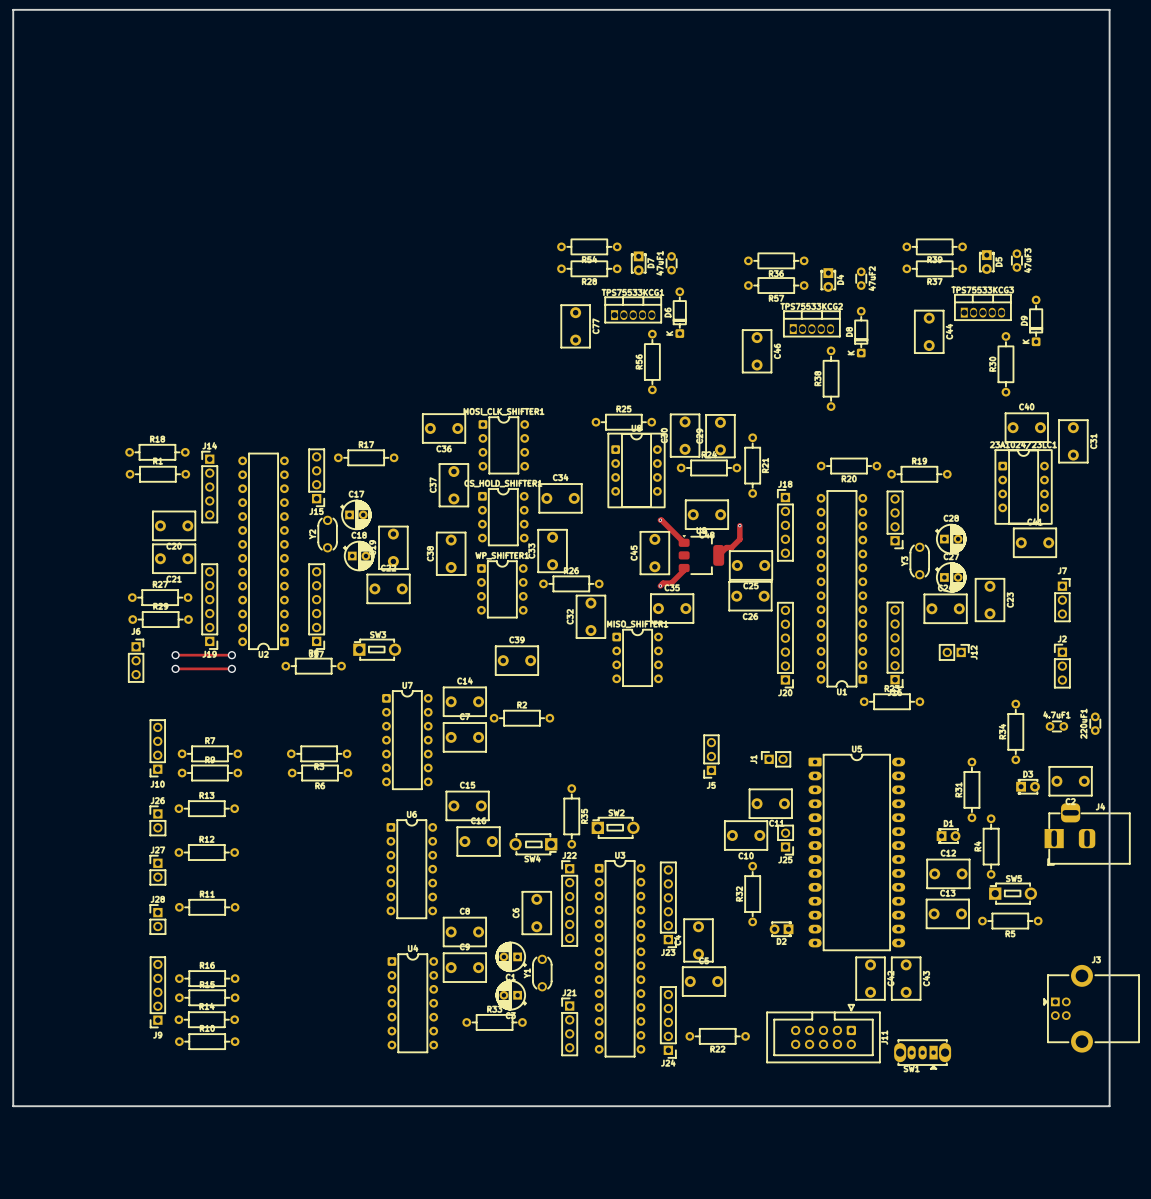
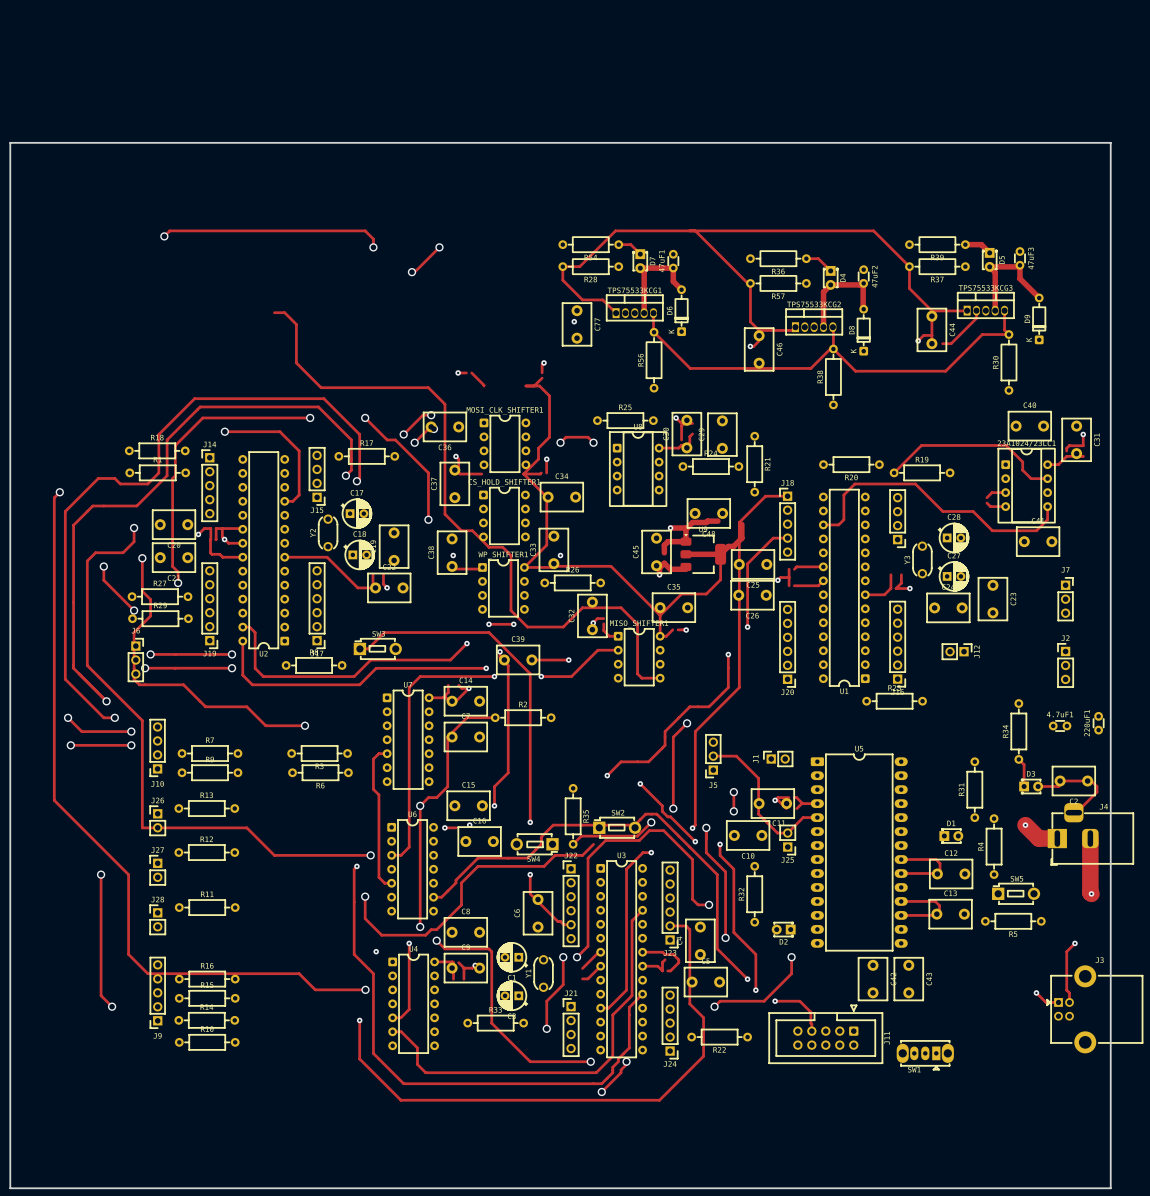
board edge: (13, 9) (1109, 9) (1109, 1106) (13, 1106) (13, 9) -> (10, 142) (10, 1188) (1110, 1188) (1110, 142) (10, 142)
track: none -> (695, 230) (747, 283) (750, 283) (750, 321) (759, 330) (792, 330) (795, 327)
track: none -> (164, 236) (169, 230) (365, 230) (373, 239) (373, 247)
via: none -> (164, 236)
track: none -> (618, 244) (630, 244) (640, 254)
track: none -> (965, 244) (981, 244) (989, 252)
via: none -> (373, 247)
track: none -> (439, 247) (414, 272) (411, 272)
via: none -> (439, 247)
track: none -> (806, 258) (818, 258) (830, 270)
via: none -> (411, 272)
track: none -> (681, 289) (673, 281) (673, 268) (640, 268) (644, 271) (644, 313)
track: none -> (1039, 297) (1019, 278) (1019, 266) (989, 266) (995, 272) (995, 310)
track: none -> (863, 309) (863, 281) (860, 284) (830, 284) (823, 292) (823, 327)
track: none -> (967, 310) (931, 310) (909, 288) (909, 266) (873, 230) (615, 230) (579, 266) (562, 266) (562, 280) (582, 299) (602, 299) (616, 313)
track: none -> (976, 310) (976, 318) (951, 343) (942, 343)
track: none -> (1004, 310) (1004, 330) (1008, 334) (982, 334) (945, 371) (855, 371) (833, 349)
track: none -> (274, 312) (284, 312) (296, 324) (296, 362) (321, 387) (428, 387) (444, 404) (444, 514) (461, 530) (472, 530) (488, 547) (502, 547) (510, 555) (510, 610) (527, 627) (563, 627) (582, 607) (621, 607) (637, 624) (637, 673) (641, 678) (660, 678)
track: none -> (653, 313) (653, 331) (690, 368) (810, 368) (830, 349) (833, 349)
via: none -> (574, 321)
track: none -> (931, 321) (932, 343)
track: none -> (832, 327) (833, 349)
track: none -> (931, 335) (923, 335) (918, 340)
track: none -> (759, 340) (753, 346) (750, 346)
via: none -> (918, 340)
via: none -> (750, 346)
track: none -> (544, 362) (542, 372)
via: none -> (544, 362)
track: none -> (458, 372) (466, 372)
via: none -> (458, 372)
track: none -> (471, 372) (483, 385)
track: none -> (542, 378) (534, 385)
track: none -> (525, 385) (539, 385) (549, 395) (549, 437) (538, 448) (538, 459) (523, 474)
track: none -> (431, 415) (422, 415) (403, 434)
via: none -> (431, 415)
track: none -> (310, 417) (202, 417) (175, 445) (175, 475) (172, 478) (172, 566) (178, 572) (178, 583)
via: none -> (310, 417)
track: none -> (365, 417) (387, 439) (395, 439) (428, 472) (428, 519)
via: none -> (365, 417)
track: none -> (676, 417) (681, 423) (692, 423)
via: none -> (676, 417)
track: none -> (684, 423) (681, 426) (681, 439)
track: none -> (433, 428) (428, 428) (414, 442)
via: none -> (433, 428)
track: none -> (224, 431) (279, 431) (299, 450) (299, 494) (292, 501) (284, 501)
via: none -> (224, 431)
track: none -> (692, 433) (687, 445) (681, 445) (678, 448) (659, 448)
via: none -> (403, 434)
track: none -> (1083, 434) (1083, 445) (1069, 445) (1066, 451)
via: none -> (1083, 434)
via: none -> (414, 442)
track: none -> (560, 442) (566, 437) (588, 437) (593, 442)
via: none -> (560, 442)
via: none -> (593, 442)
track: none -> (455, 456) (458, 459) (458, 467)
via: none -> (455, 456)
track: none -> (1083, 456) (1066, 456) (1058, 464) (1047, 464)
track: none -> (546, 459) (546, 472)
via: none -> (546, 459)
track: none -> (458, 472) (481, 474)
track: none -> (541, 472) (523, 474) (546, 497) (546, 545) (524, 567) (611, 566) (660, 615)
track: none -> (894, 472) (921, 445) (1006, 445) (1022, 461) (1022, 470) (1031, 478) (1047, 478)
track: none -> (345, 475) (351, 470) (351, 439) (318, 406) (200, 406) (167, 439) (167, 475) (136, 505) (92, 505) (73, 525) (73, 668) (106, 701)
via: none -> (345, 475)
track: none -> (356, 481) (359, 478) (359, 434) (323, 398) (194, 398) (158, 434) (158, 472) (147, 483) (120, 483) (114, 478) (98, 478) (65, 511) (65, 679) (103, 717) (114, 717)
via: none -> (356, 481)
track: none -> (59, 492) (54, 497) (54, 800) (128, 874) (128, 954) (147, 973) (299, 973) (315, 989) (365, 989)
via: none -> (59, 492)
track: none -> (1005, 492) (992, 492) (986, 497)
track: none -> (787, 496) (765, 496) (739, 522) (739, 687) (695, 731) (695, 825) (692, 828)
track: none -> (986, 503) (990, 506) (1005, 506)
track: none -> (1047, 506) (1047, 519) (1036, 530) (992, 530) (973, 511) (942, 511) (915, 483) (854, 483) (843, 494) (843, 519) (838, 524) (823, 524)
via: none -> (428, 519)
track: (660, 520) (684, 542) -> none
via: (660, 520) -> none
track: none -> (717, 521) (692, 522) (685, 529) (685, 541) (667, 541) (664, 545) (664, 552)
via: (739, 525) -> none
track: none -> (134, 528) (134, 541) (123, 552) (95, 552) (87, 561) (87, 665) (142, 720) (142, 827) (246, 827) (274, 855) (370, 855)
via: none -> (134, 528)
track: none -> (222, 528) (222, 537) (228, 543) (242, 543)
track: none -> (670, 528) (687, 528)
via: none -> (670, 528)
track: none -> (242, 529) (216, 528) (215, 539)
track: none -> (198, 534) (204, 528) (210, 528) (212, 554) (219, 554) (222, 557) (242, 557)
via: none -> (198, 534)
track: none -> (787, 538) (773, 538) (747, 563) (747, 627)
via: none -> (224, 539)
track: none -> (685, 554) (720, 554) (720, 579) (706, 594) (681, 594) (660, 615)
track: none -> (142, 555) (142, 591) (150, 599) (150, 616) (134, 632) (134, 679) (139, 684) (183, 684) (205, 706) (246, 706) (265, 725) (304, 725)
via: none -> (453, 555)
via: none -> (560, 555)
track: none -> (284, 557) (327, 557) (357, 587) (372, 587) (373, 574)
via: none -> (142, 558)
track: none -> (103, 566) (103, 580) (134, 610)
via: none -> (103, 566)
track: none -> (823, 566) (796, 566) (794, 569)
track: none -> (482, 567) (480, 569) (452, 569)
track: none -> (685, 566) (683, 569) (670, 569) (664, 563) (659, 568) (659, 574)
track: (684, 570) (671, 583) (663, 583) (660, 585) -> none
track: none -> (789, 569) (789, 585)
track: none -> (383, 574) (383, 584) (387, 587) (385, 587)
via: none -> (659, 574)
track: none -> (890, 574) (890, 588) (884, 594) (865, 594)
track: none -> (901, 574) (901, 583) (896, 588) (909, 588)
track: none -> (789, 577) (780, 577) (777, 580)
via: none -> (777, 580)
track: none -> (823, 580) (818, 585) (794, 585)
via: none -> (178, 583)
via: (660, 585) -> none
via: none -> (387, 587)
via: none -> (909, 588)
via: none -> (134, 610)
track: none -> (660, 615) (660, 636) (666, 636) (672, 629)
track: none -> (603, 618) (597, 618) (593, 623)
via: none -> (593, 623)
track: none -> (603, 623) (603, 630) (609, 636) (618, 636)
track: none -> (488, 624) (513, 624)
via: none -> (488, 624)
via: none -> (513, 624)
track: none -> (242, 627) (249, 627) (255, 632) (255, 668) (263, 676) (354, 676) (370, 660) (450, 660) (466, 643)
via: none -> (747, 627)
track: none -> (678, 629) (686, 630)
via: none -> (686, 630)
track: none -> (242, 641) (242, 675) (252, 684) (359, 684) (376, 668) (486, 668)
via: none -> (466, 643)
track: none -> (359, 648) (368, 648) (384, 632) (488, 632) (530, 673) (530, 822)
track: none -> (618, 650) (597, 650) (571, 676) (541, 676)
track: none -> (499, 651) (499, 657) (508, 665) (508, 772) (494, 786) (494, 805)
via: none -> (499, 651)
track: none -> (150, 654) (175, 654)
via: none -> (150, 654)
via: (175, 655) -> none
track: none -> (728, 654) (728, 687) (709, 706) (689, 706) (665, 731) (665, 745) (648, 761) (621, 761) (607, 775)
via: none -> (728, 654)
track: none -> (533, 660) (568, 660)
via: none -> (568, 660)
track: none -> (145, 668) (175, 668)
via: none -> (145, 668)
via: (175, 668) -> none
via: none -> (486, 668)
track: none -> (494, 676) (420, 676) (409, 687) (409, 847) (401, 855) (391, 855)
via: none -> (494, 676)
via: none -> (541, 676)
track: none -> (448, 685) (448, 692) (443, 697)
track: none -> (458, 685) (461, 688) (468, 688) (454, 701)
via: none -> (468, 688)
track: none -> (429, 697) (446, 697) (449, 701)
via: none -> (106, 701)
track: none -> (68, 717) (81, 731) (131, 731)
via: none -> (68, 717)
via: none -> (114, 717)
track: none -> (495, 717) (467, 717) (447, 737) (447, 786) (436, 797) (428, 797) (420, 805) (420, 926)
track: none -> (687, 723) (673, 737) (673, 808)
via: none -> (687, 723)
via: none -> (304, 725)
via: none -> (131, 731)
track: none -> (70, 745) (131, 745)
via: none -> (70, 745)
via: none -> (131, 745)
track: none -> (387, 753) (378, 753) (373, 759) (373, 789) (378, 794) (378, 877) (384, 883) (391, 883)
track: none -> (713, 756) (736, 756) (758, 778) (758, 814) (777, 833) (787, 833) (803, 817) (817, 817)
track: none -> (1018, 759) (1024, 764) (1024, 786)
via: none -> (607, 775)
track: none -> (1084, 781) (1064, 781) (1058, 786) (1038, 786)
track: none -> (1090, 781) (1096, 786) (1096, 792) (1076, 812) (1073, 812)
track: none -> (640, 783) (662, 805) (662, 811) (667, 816) (670, 816) (695, 841)
via: none -> (640, 783)
track: none -> (733, 792) (733, 811)
via: none -> (733, 792)
track: none -> (788, 797) (777, 797) (775, 800) (778, 800) (786, 808)
track: none -> (794, 797) (802, 803)
via: none -> (775, 800)
track: none -> (817, 803) (801, 803) (796, 808)
via: none -> (420, 805)
via: none -> (494, 805)
via: none -> (673, 808)
via: none -> (733, 811)
via: none -> (530, 822)
track: none -> (651, 822) (637, 836) (581, 836) (573, 844)
via: none -> (651, 822)
via: none -> (469, 825)
track: none -> (1025, 825) (1038, 838) (1057, 838)
via: none -> (1025, 825)
track: none -> (444, 827) (456, 827)
via: none -> (444, 827)
track: none -> (706, 827) (706, 852) (725, 871) (725, 937)
via: none -> (706, 827)
via: none -> (692, 828)
track: none -> (1090, 838) (1091, 893)
via: none -> (695, 841)
track: none -> (593, 844) (582, 855) (555, 855) (544, 866) (477, 866) (461, 882) (461, 904) (436, 929) (431, 929) (425, 935) (381, 935) (365, 918) (365, 896)
track: none -> (720, 844) (720, 855) (733, 869) (733, 932) (755, 954) (755, 990)
via: none -> (720, 844)
track: none -> (651, 852) (643, 852) (626, 869) (626, 990) (608, 1008) (600, 1008)
via: none -> (651, 852)
via: none -> (370, 855)
track: none -> (901, 859) (936, 859) (940, 863) (940, 873)
track: none -> (356, 866) (354, 869) (354, 954) (373, 973) (373, 1053) (403, 1083) (601, 1083) (612, 1072) (612, 1067) (629, 1047) (629, 1007) (642, 994)
via: none -> (356, 866)
track: none -> (901, 873) (934, 873)
track: none -> (101, 874) (101, 995) (112, 1006)
via: none -> (101, 874)
track: none -> (530, 874) (530, 893) (557, 921) (563, 924) (571, 924)
via: none -> (530, 874)
via: none -> (1091, 893)
via: none -> (365, 896)
track: none -> (433, 897) (441, 897) (477, 858) (527, 858) (541, 844) (541, 837) (553, 825) (634, 825) (645, 814) (656, 814) (717, 874) (717, 948) (747, 979)
track: none -> (901, 901) (935, 901) (939, 905) (939, 914)
track: none -> (709, 904) (698, 904) (692, 899) (692, 859) (663, 830) (649, 830) (639, 840) (605, 840) (588, 858) (588, 946) (577, 957)
via: none -> (709, 904)
track: none -> (642, 910) (632, 920) (632, 995) (612, 1014) (612, 1056) (596, 1072) (425, 1072) (417, 1064) (417, 1047) (401, 1031) (392, 1031)
track: none -> (934, 914) (901, 915)
track: none -> (670, 925) (686, 925) (689, 929) (689, 1003) (703, 1017) (703, 1056) (659, 1100) (400, 1100) (359, 1058) (359, 1020)
via: none -> (420, 926)
via: none -> (725, 937)
track: none -> (436, 940) (444, 948) (488, 948) (491, 951) (491, 1023) (530, 1061) (590, 1061)
via: none -> (436, 940)
track: none -> (409, 943) (409, 1009) (400, 1017) (392, 1017)
via: none -> (409, 943)
track: none -> (1074, 943) (1066, 951) (1066, 990) (1069, 992) (1069, 1002)
via: none -> (1074, 943)
via: none -> (376, 951)
track: none -> (600, 952) (582, 968)
track: none -> (642, 952) (662, 952) (665, 954) (673, 954) (678, 959) (678, 962) (670, 970) (667, 970)
track: none -> (563, 957) (563, 984) (546, 1001) (546, 1028)
via: none -> (563, 957)
via: none -> (577, 957)
track: none -> (791, 957) (791, 973) (764, 1001) (720, 1001) (714, 1006)
via: none -> (791, 957)
track: none -> (665, 959) (662, 962) (662, 970) (657, 966) (642, 966)
track: none -> (434, 961) (452, 961) (453, 979)
track: none -> (458, 962) (464, 968)
track: none -> (475, 965) (472, 968) (464, 968)
via: none -> (475, 965)
track: none -> (600, 966) (587, 978) (582, 978)
track: none -> (464, 968) (463, 979)
via: none -> (747, 979)
via: none -> (365, 989)
via: none -> (755, 990)
track: none -> (1036, 992) (1045, 1002) (1058, 1002)
via: none -> (1036, 992)
track: none -> (775, 1001) (799, 1001) (810, 1012) (811, 1031)
via: none -> (775, 1001)
via: none -> (112, 1006)
via: none -> (714, 1006)
via: none -> (359, 1020)
via: none -> (546, 1028)
via: none -> (590, 1061)
track: none -> (626, 1061) (621, 1072) (601, 1091)
via: none -> (626, 1061)
via: none -> (601, 1091)

